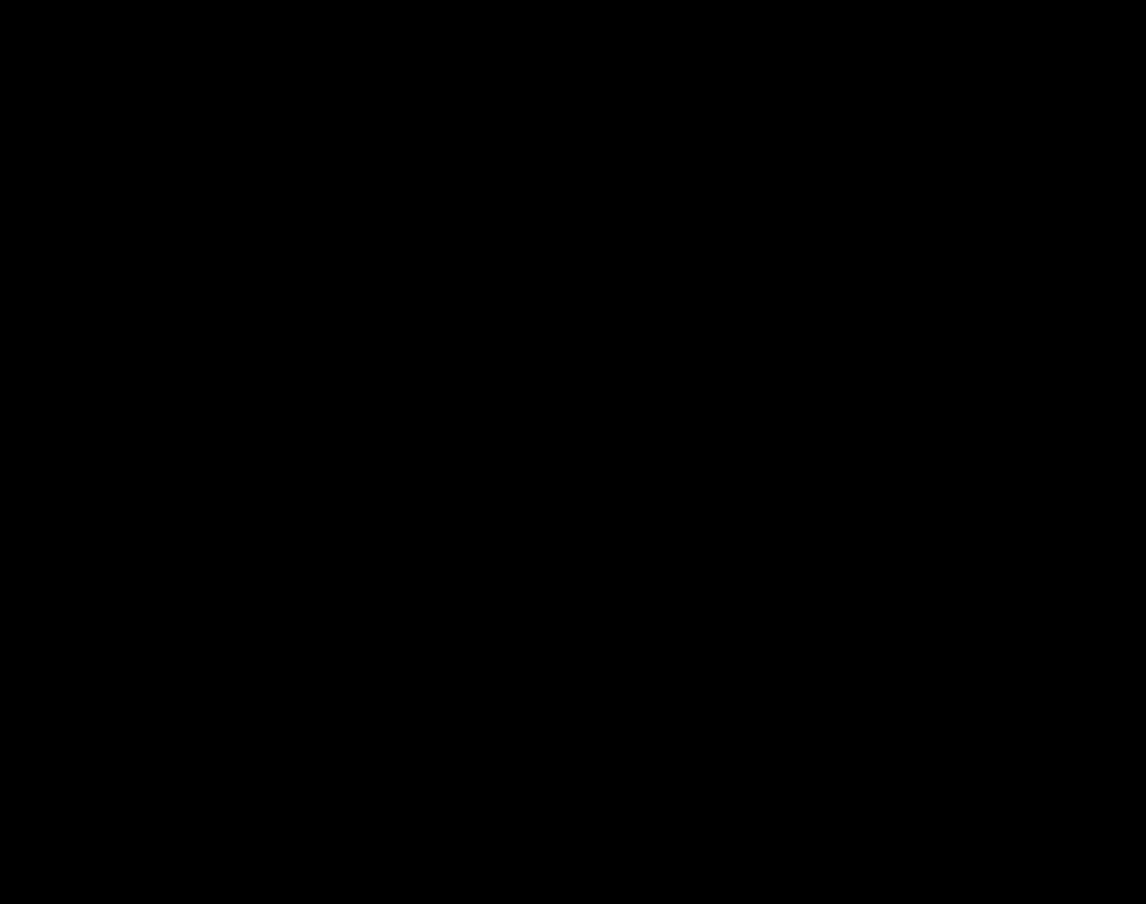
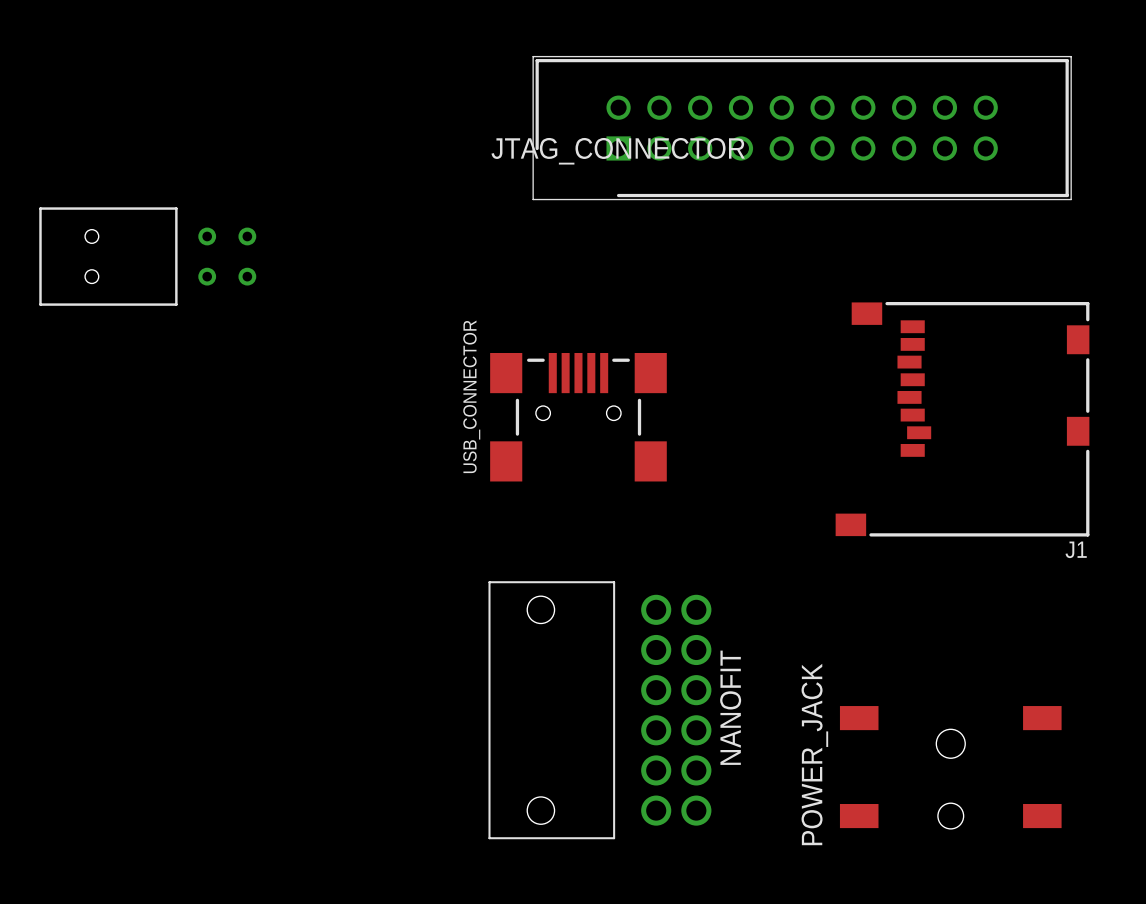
JTAG_CONNECTOR: none -> (802, 128)
part: none -> (147, 256)
USB_CONNECTOR: none -> (578, 417)
J1: none -> (962, 419)
part: none -> (599, 710)
POWER_JACK: none -> (950, 767)

